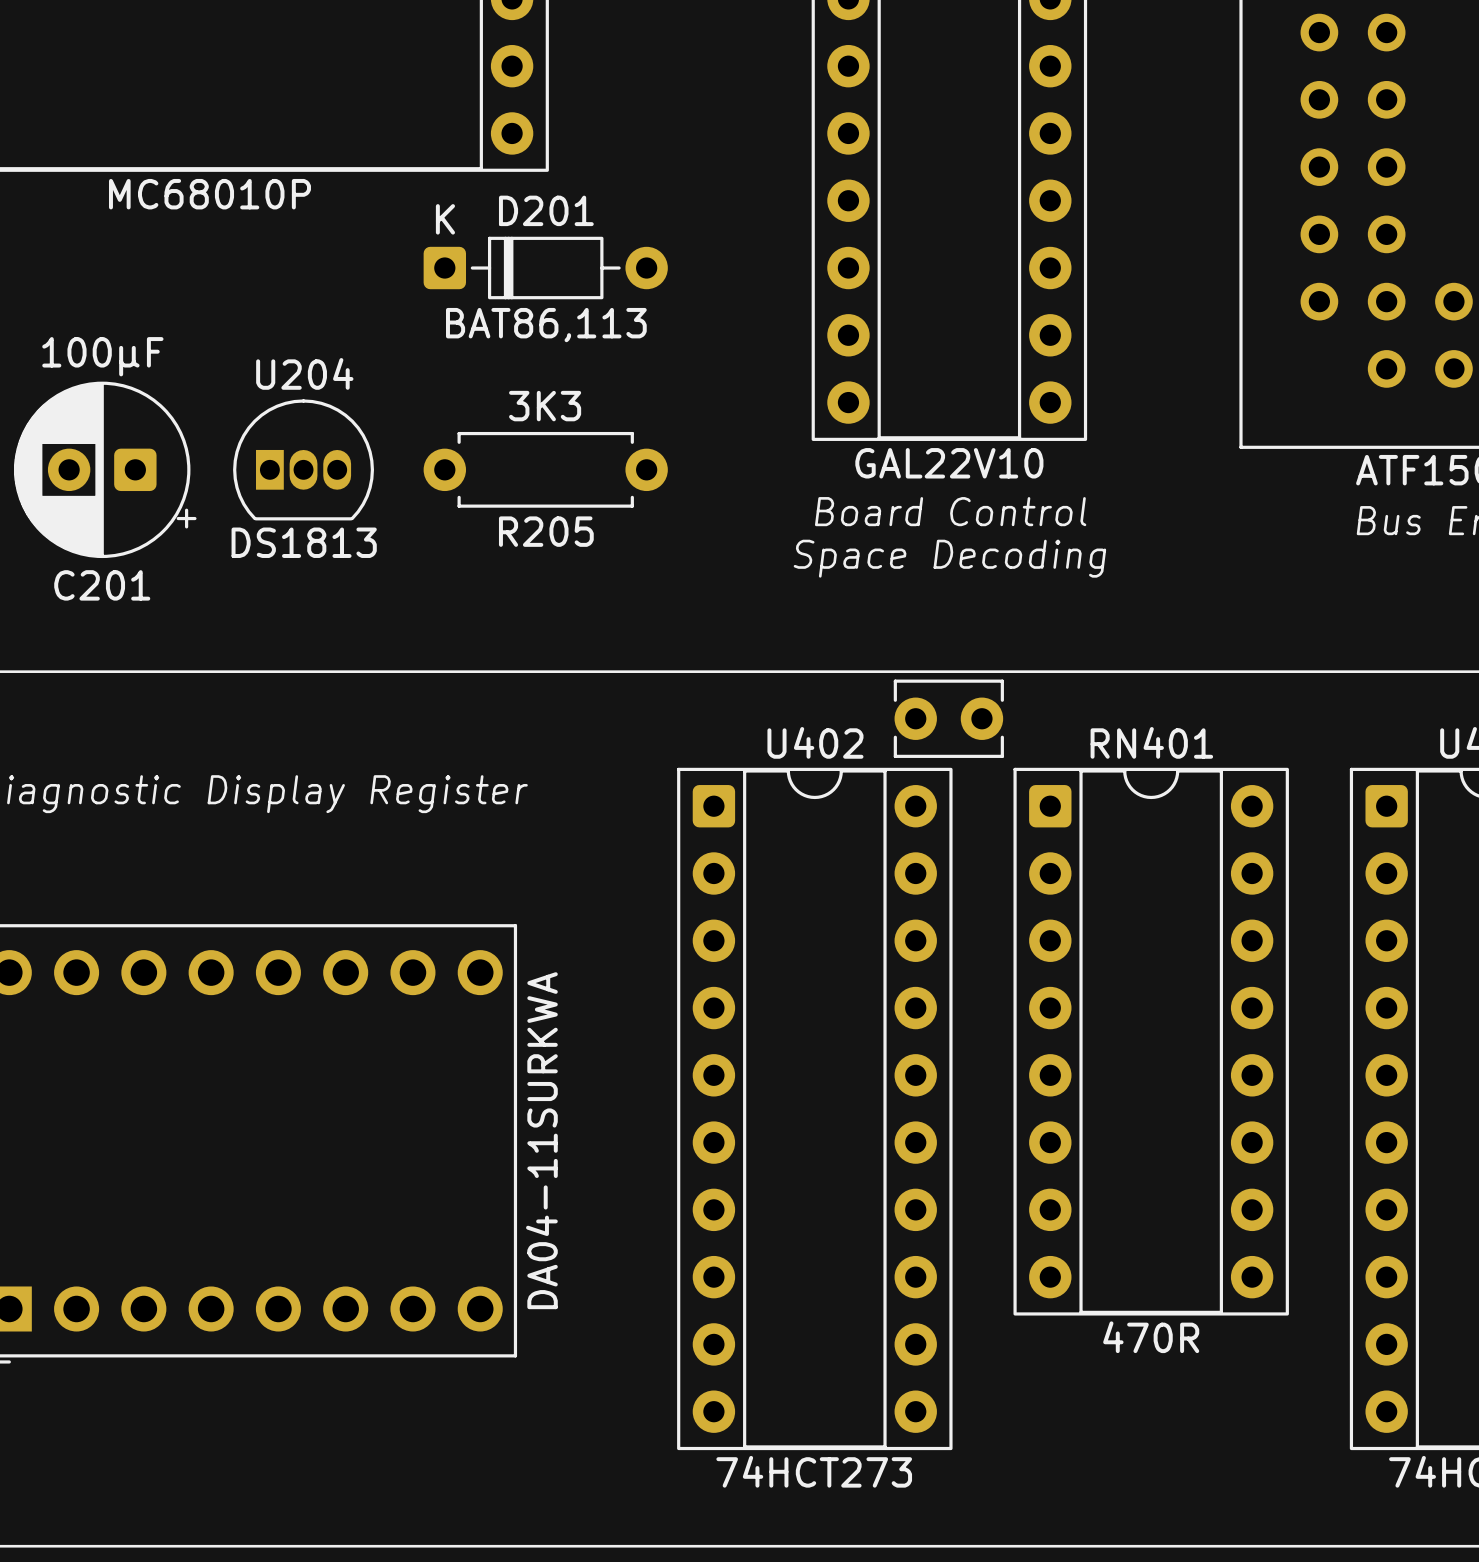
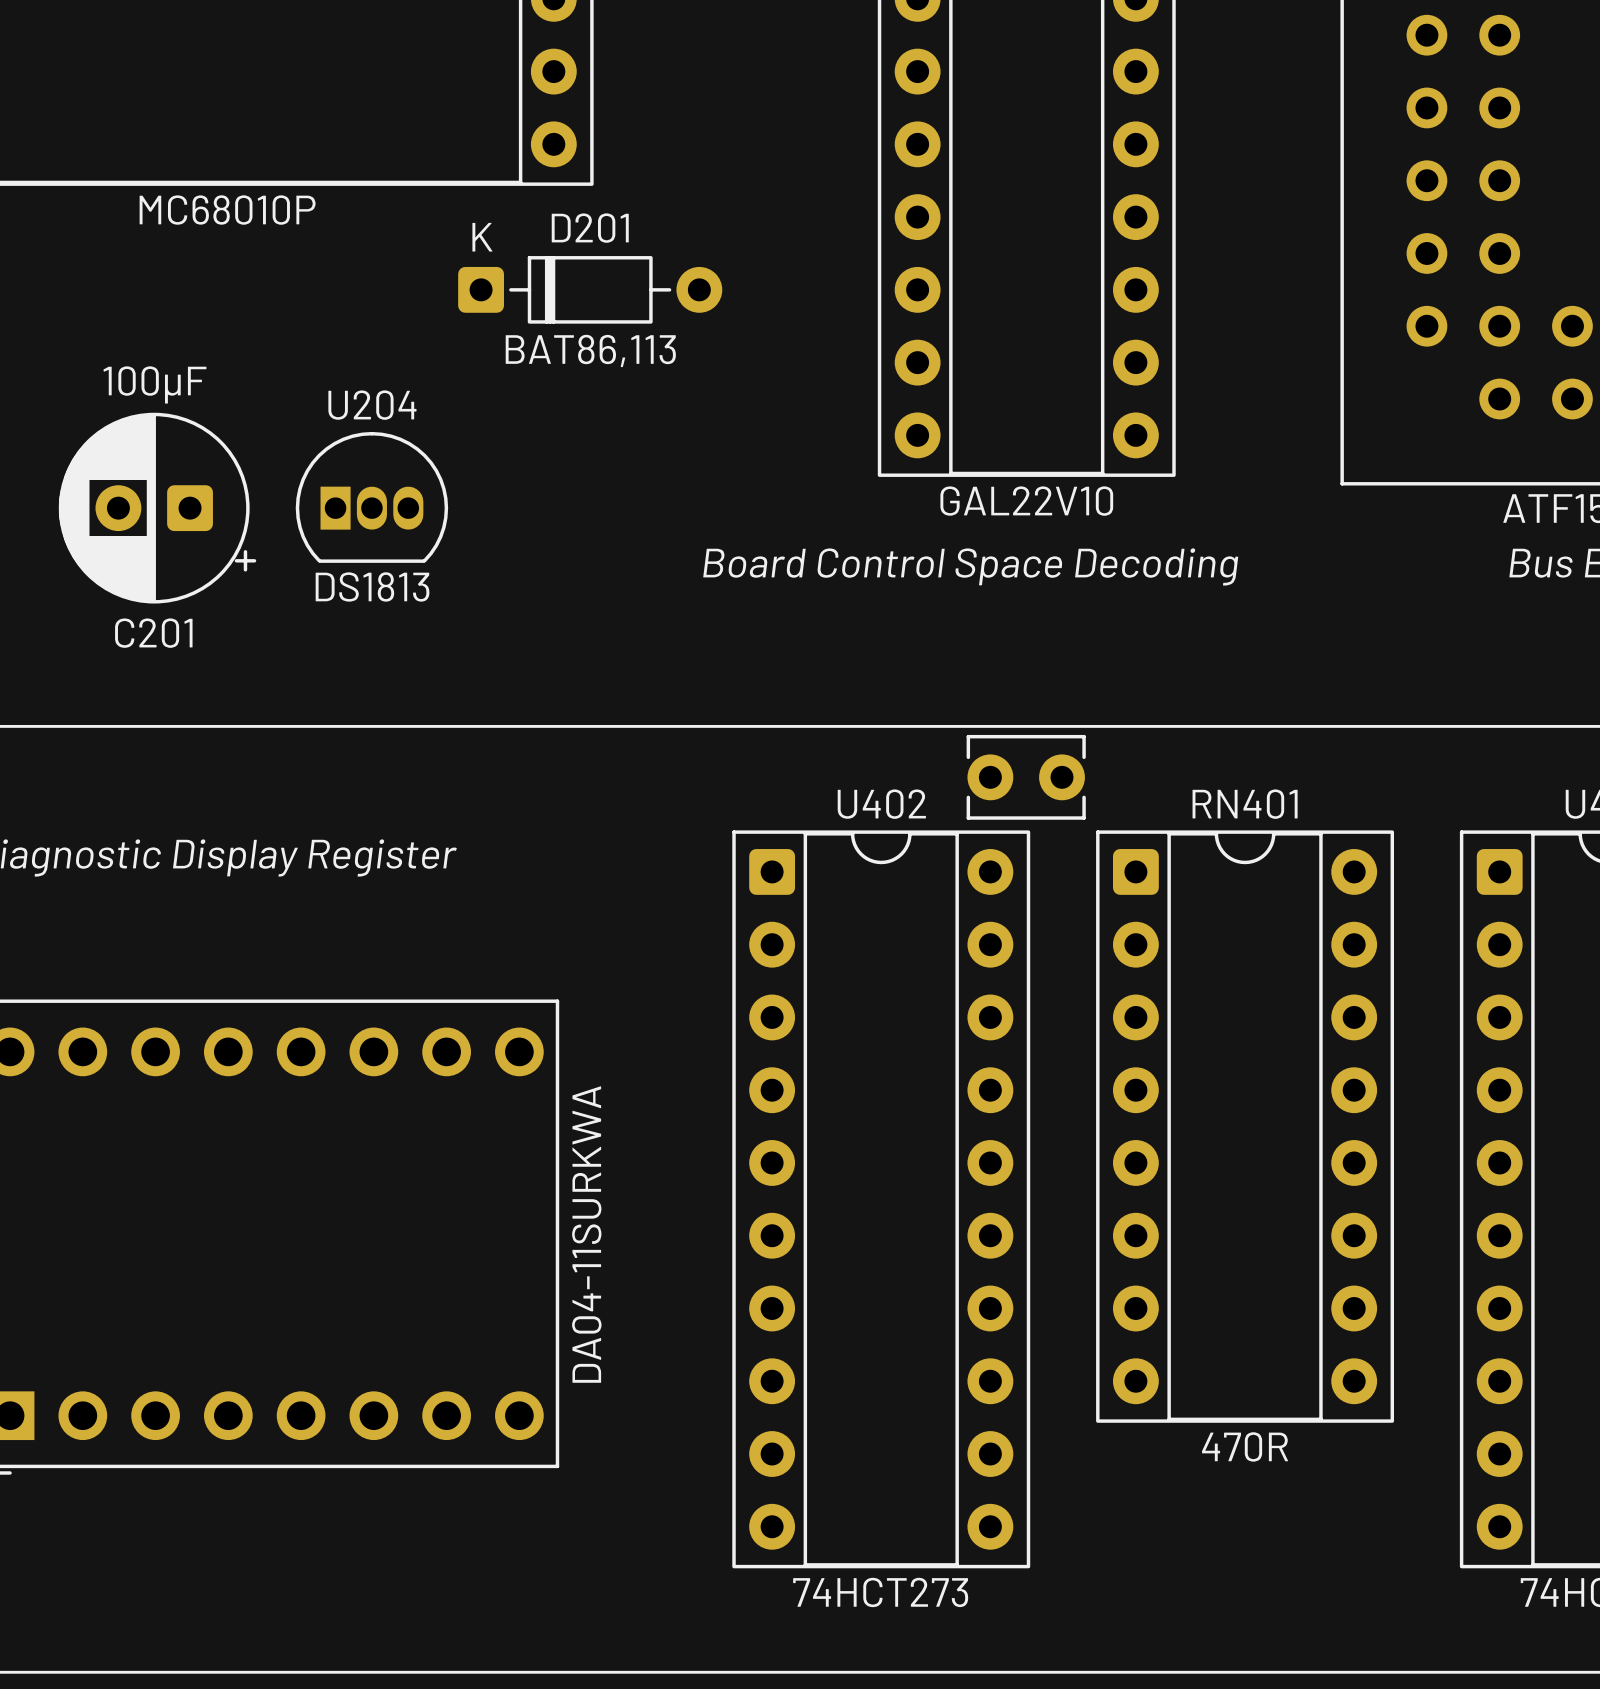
U204 position: (303, 459) -> (371, 497)
C201 position: (105, 469) -> (157, 508)
R205: 3K3 (545, 469) -> none
text: Board Control (950, 511) -> none
text: none -> Board Control Space Decoding (970, 566)
text: Space Decoding (949, 558) -> none

